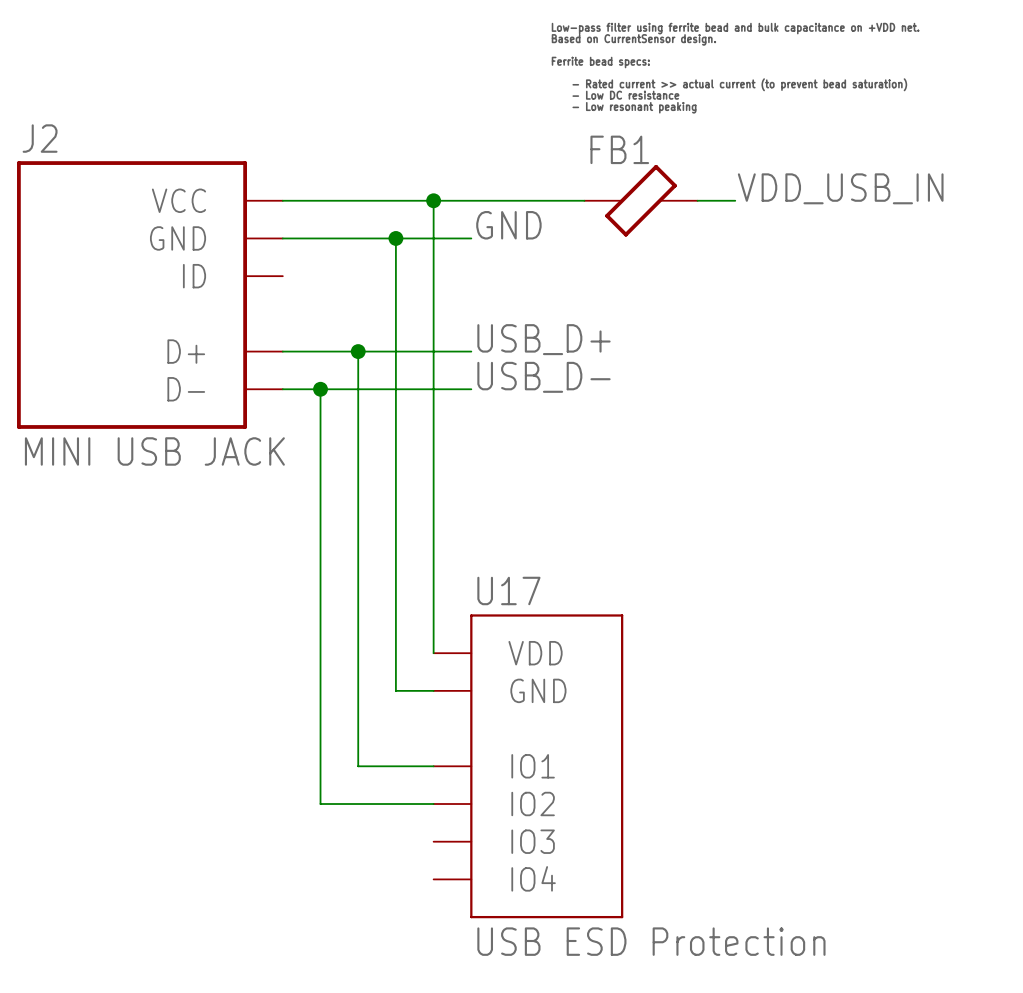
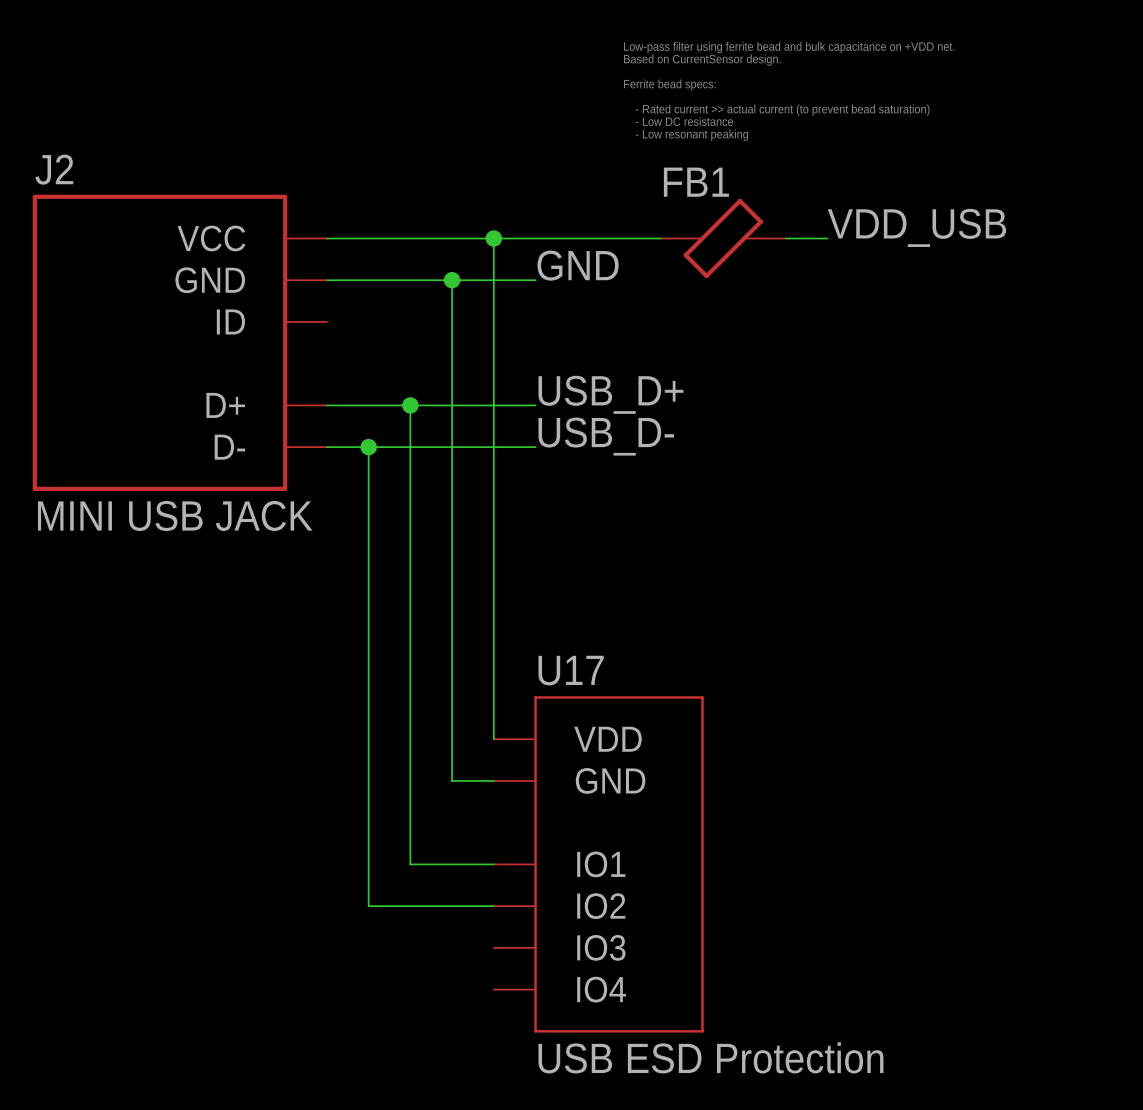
label: VDD_USB_IN (840, 188) -> VDD_USB (916, 227)

